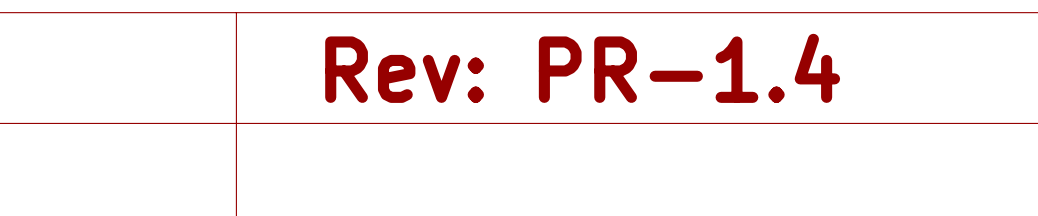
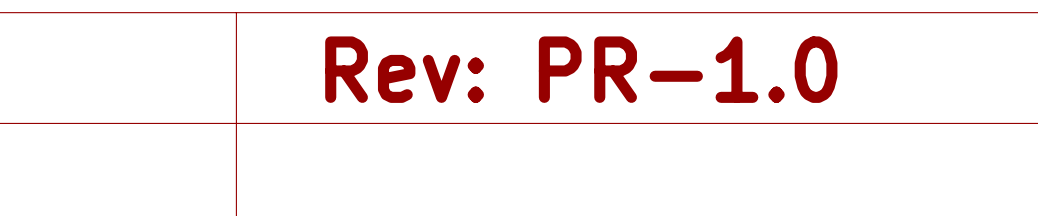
title block: Rev: PR-1.4 (582, 68) -> Rev: PR-1.0 (581, 69)

